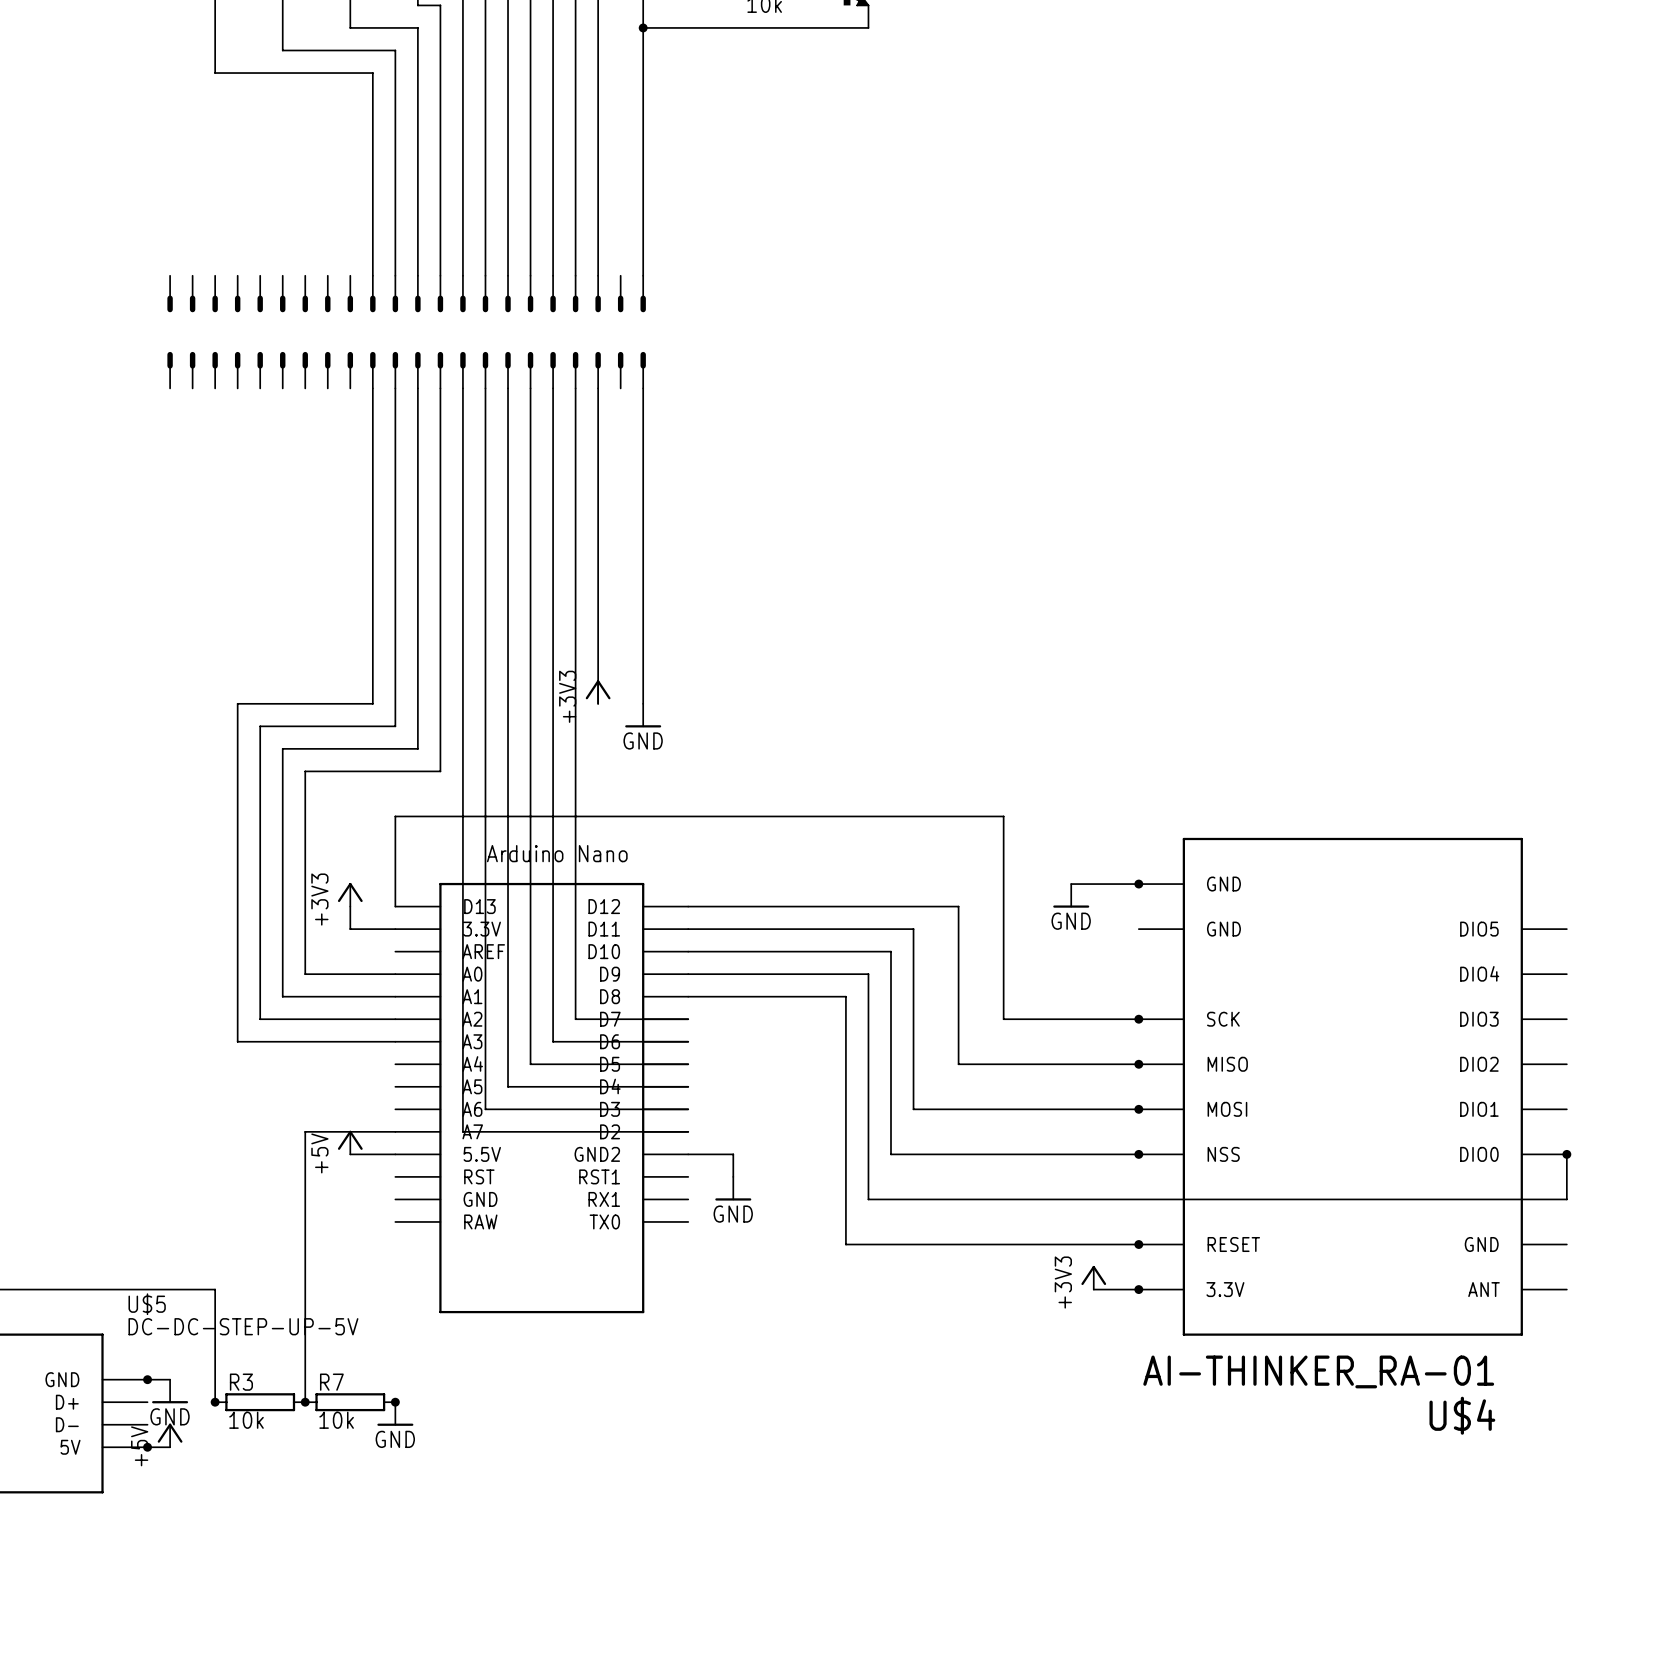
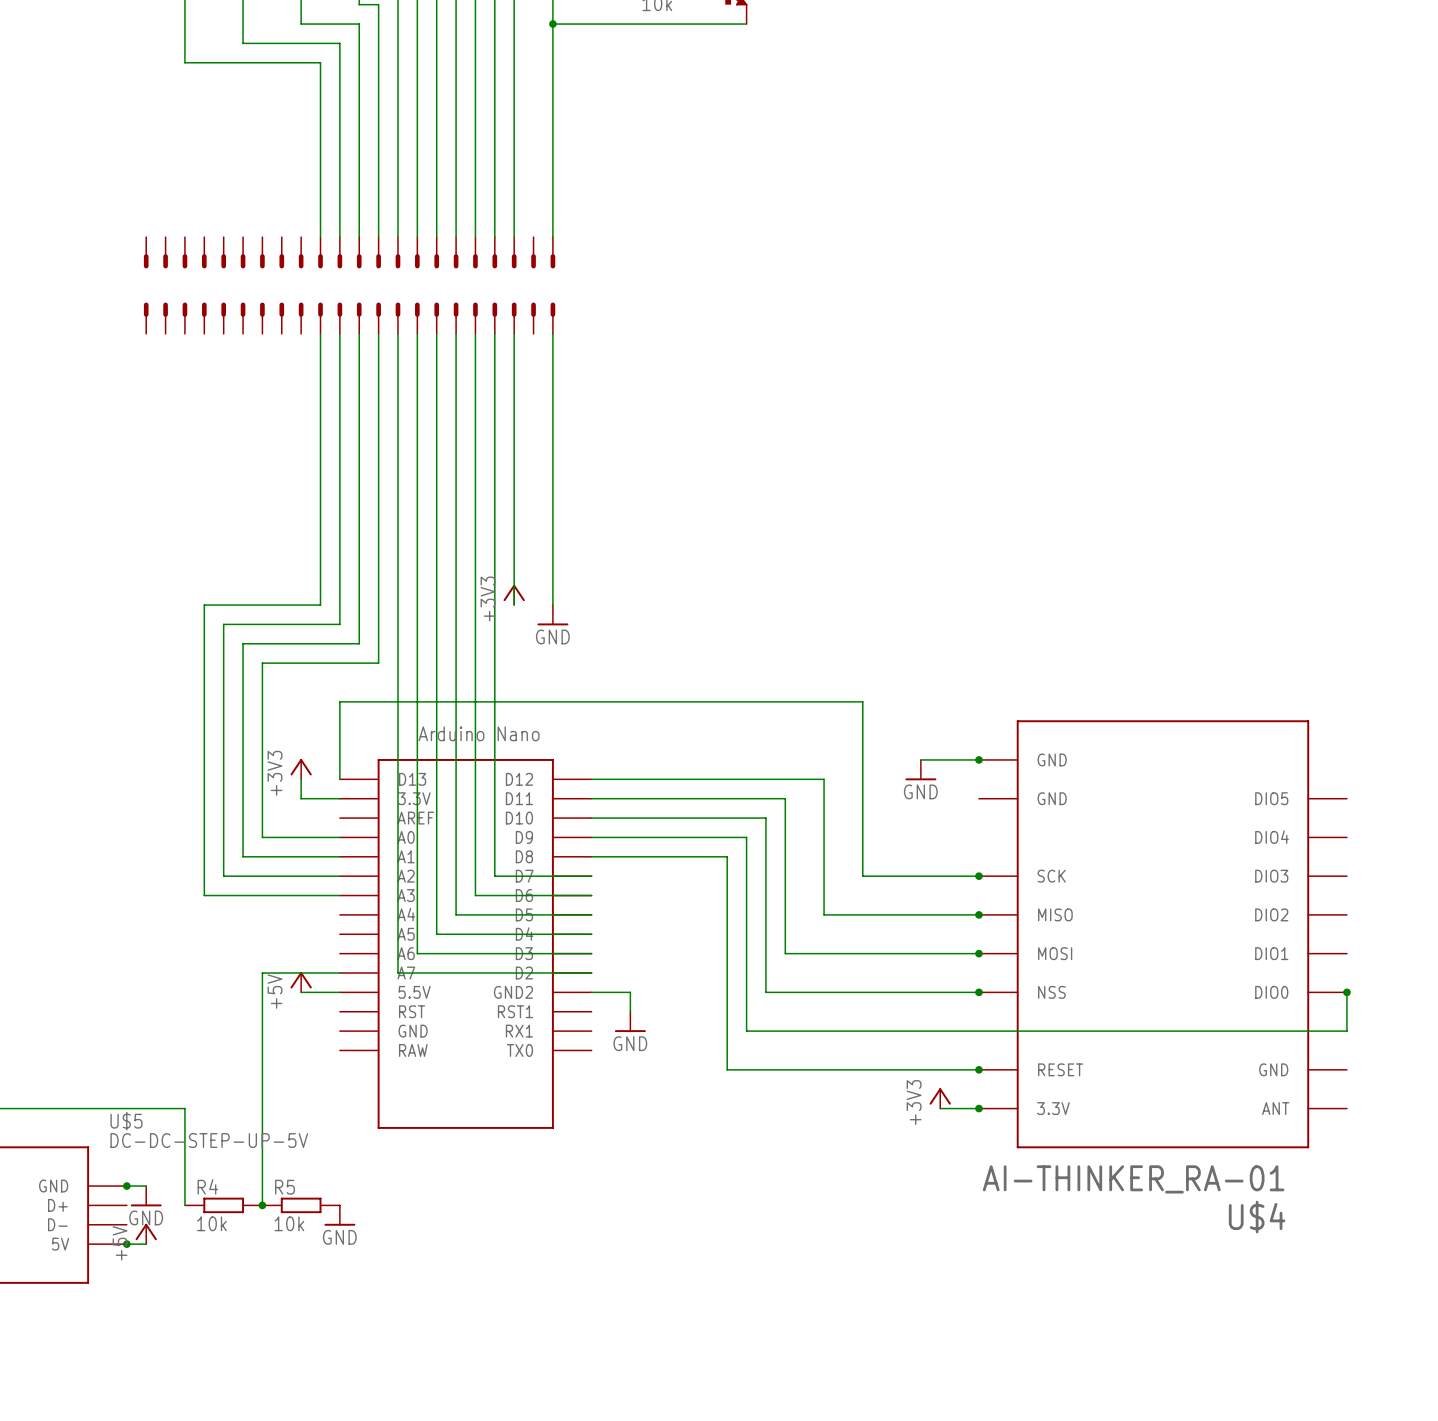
junction: (215, 1402) -> none
R3: 10k (260, 1402) -> none
R4: none -> 10k (223, 1205)
R7: 10k (350, 1402) -> none
R5: none -> 10k (301, 1205)
junction: (395, 1402) -> none

